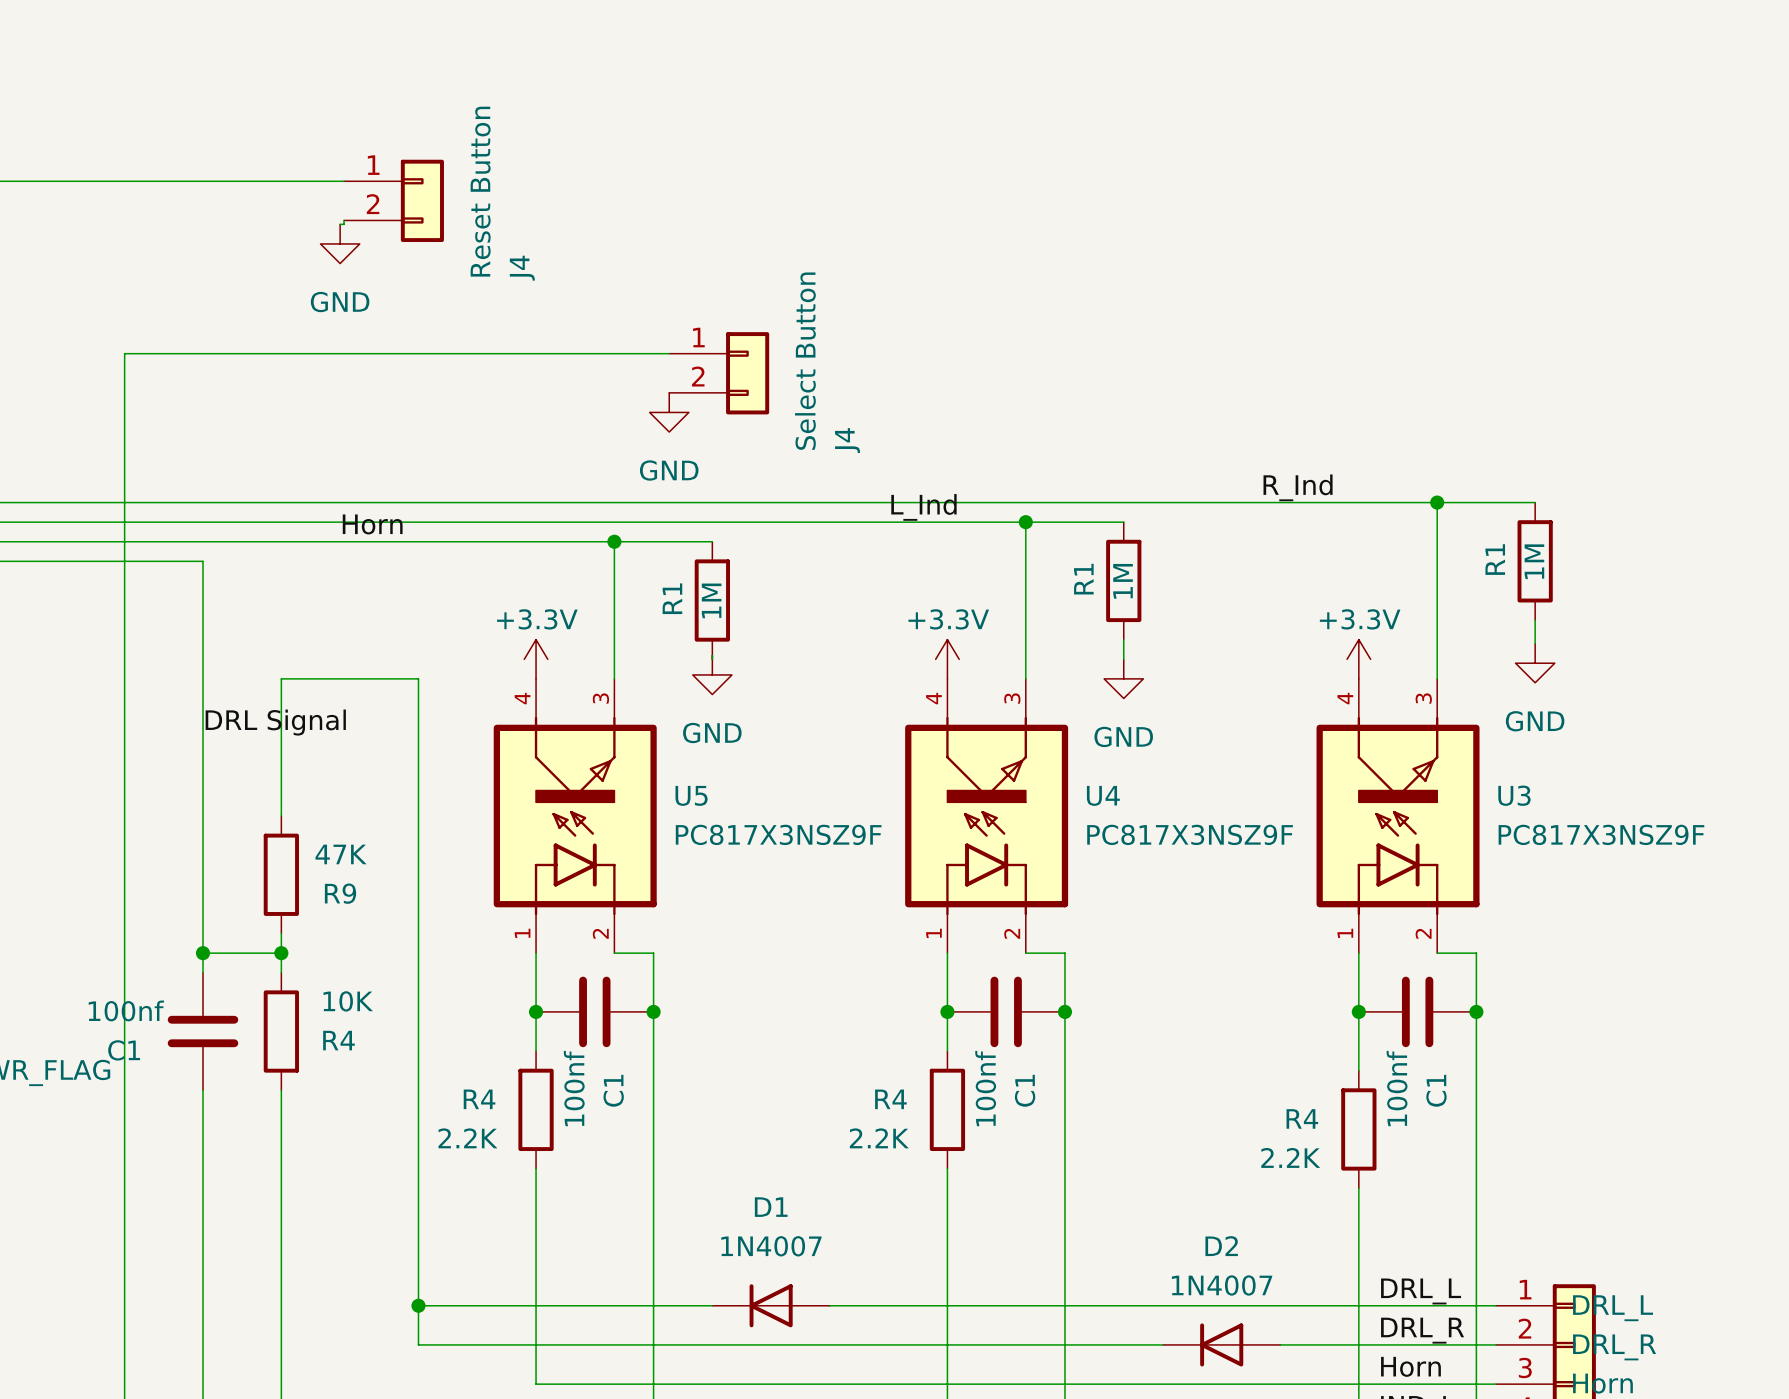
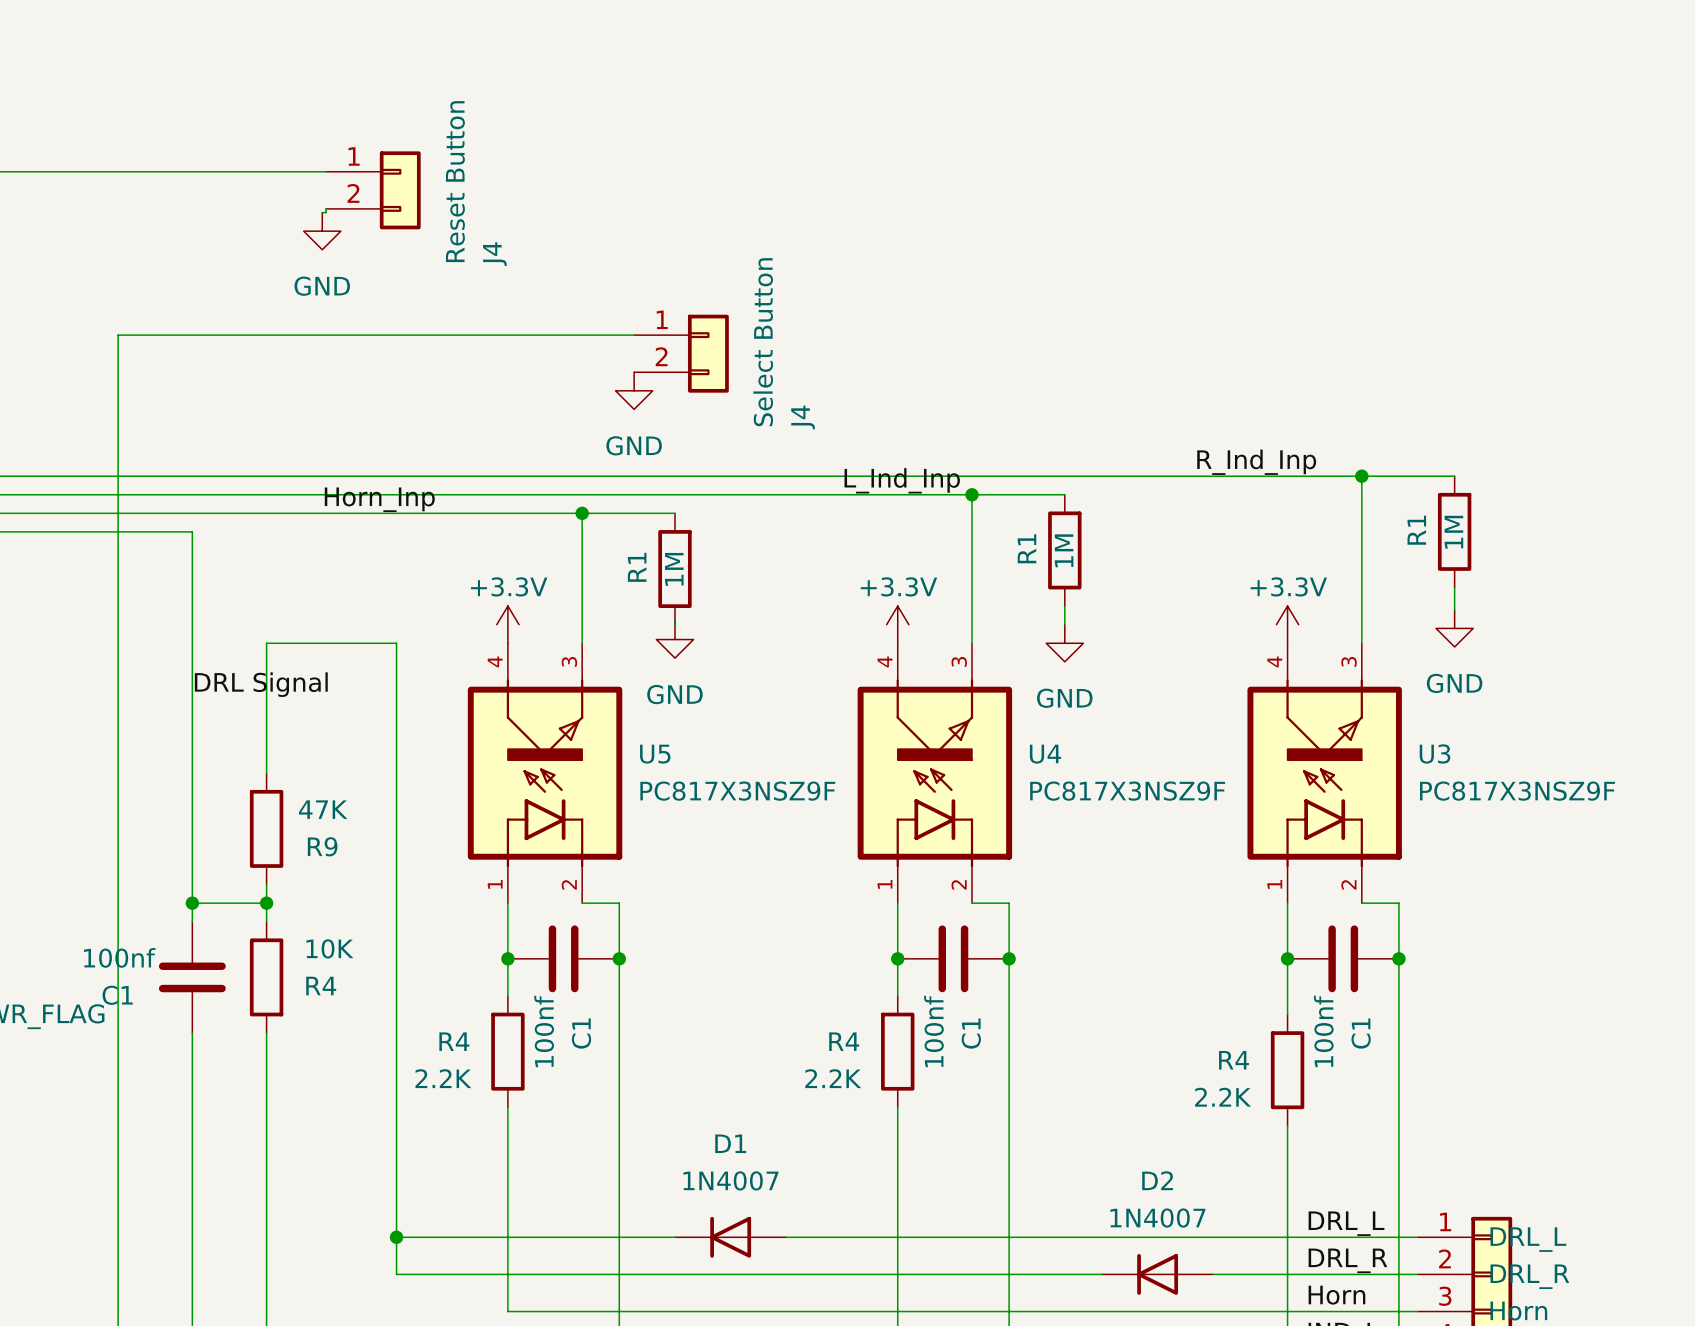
label: R_Ind (1298, 487) -> R_Ind_Inp (1256, 462)
label: L_Ind (923, 507) -> L_Ind_Inp (902, 480)
label: Horn (372, 524) -> Horn_Inp (379, 499)

